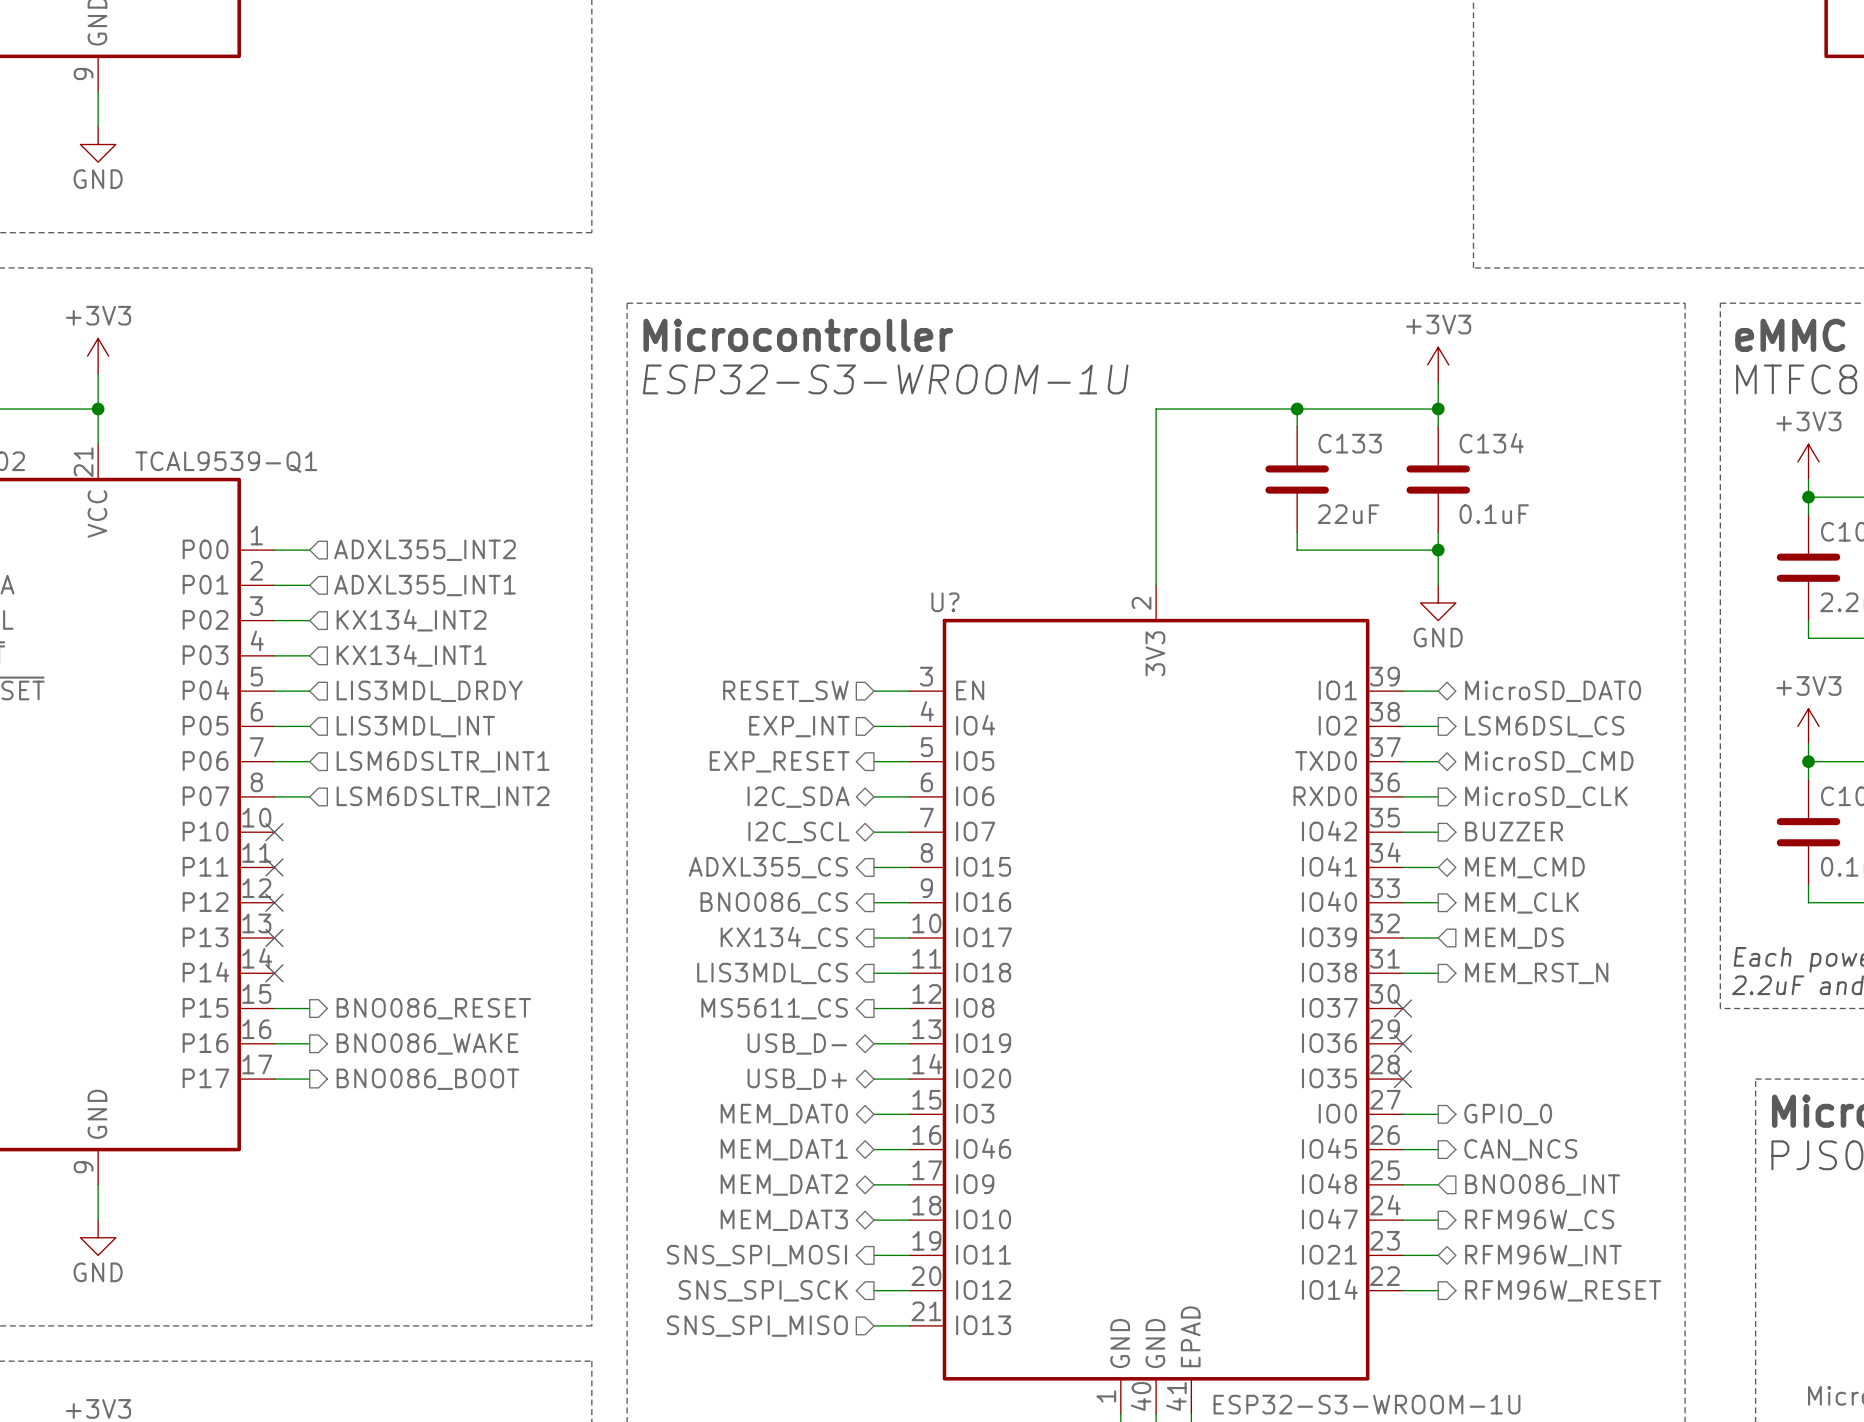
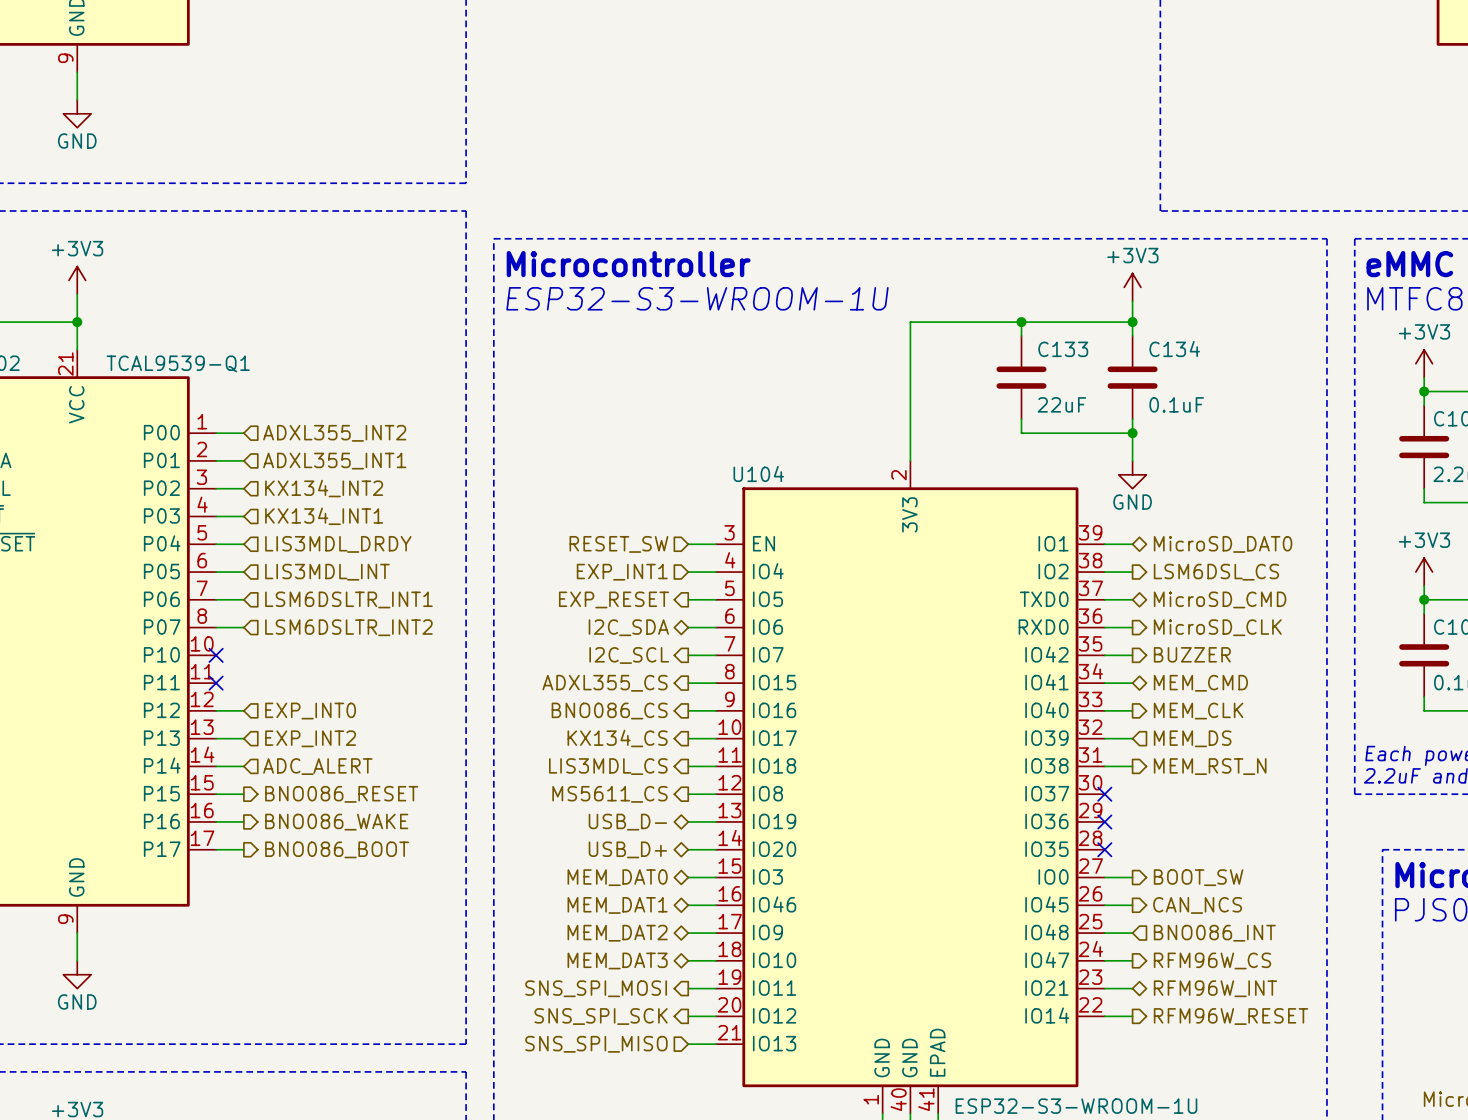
U? name: U? (945, 602) -> U104 (758, 473)
hierarchical label: EXP_INT (799, 726) -> EXP_INT1 (622, 572)
hierarchical label shape: bidirectional (798, 832) -> output (629, 655)
wire: none -> (216, 710) (243, 710)
no-connect mark: (274, 902) -> none
hierarchical label: none -> EXP_INT0 (310, 711)
wire: none -> (216, 738) (243, 738)
no-connect mark: (274, 937) -> none
hierarchical label: none -> EXP_INT2 (310, 738)
wire: none -> (216, 766) (243, 766)
no-connect mark: (274, 973) -> none
hierarchical label: none -> ADC_ALERT (317, 766)
hierarchical label: GPIO_0 (1508, 1114) -> BOOT_SW (1198, 877)

